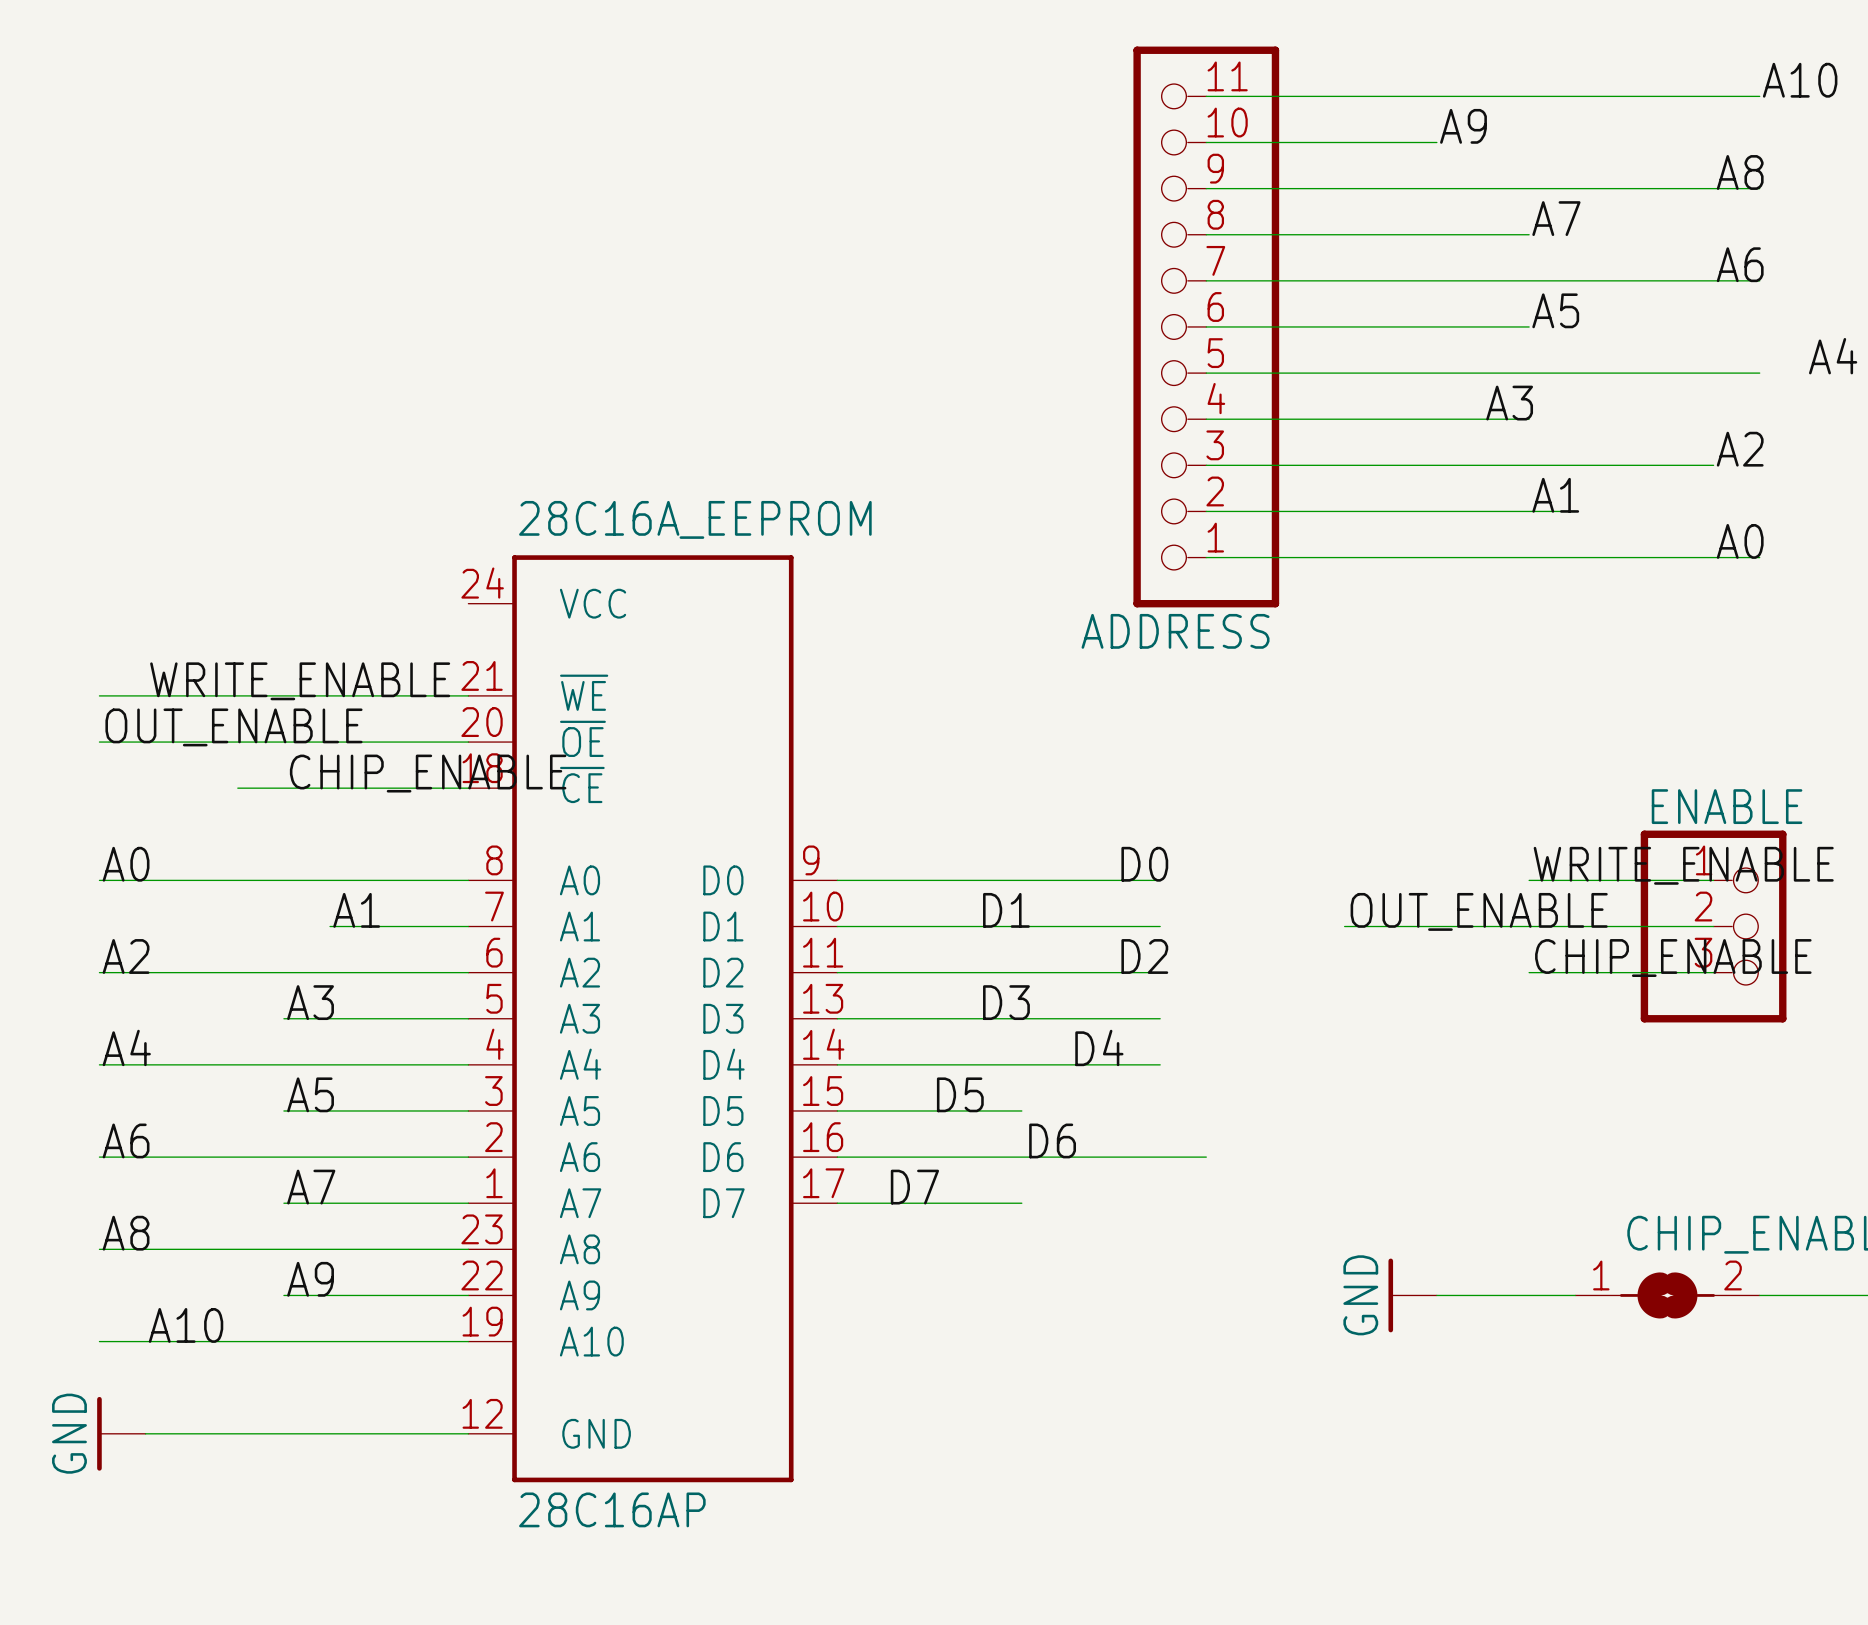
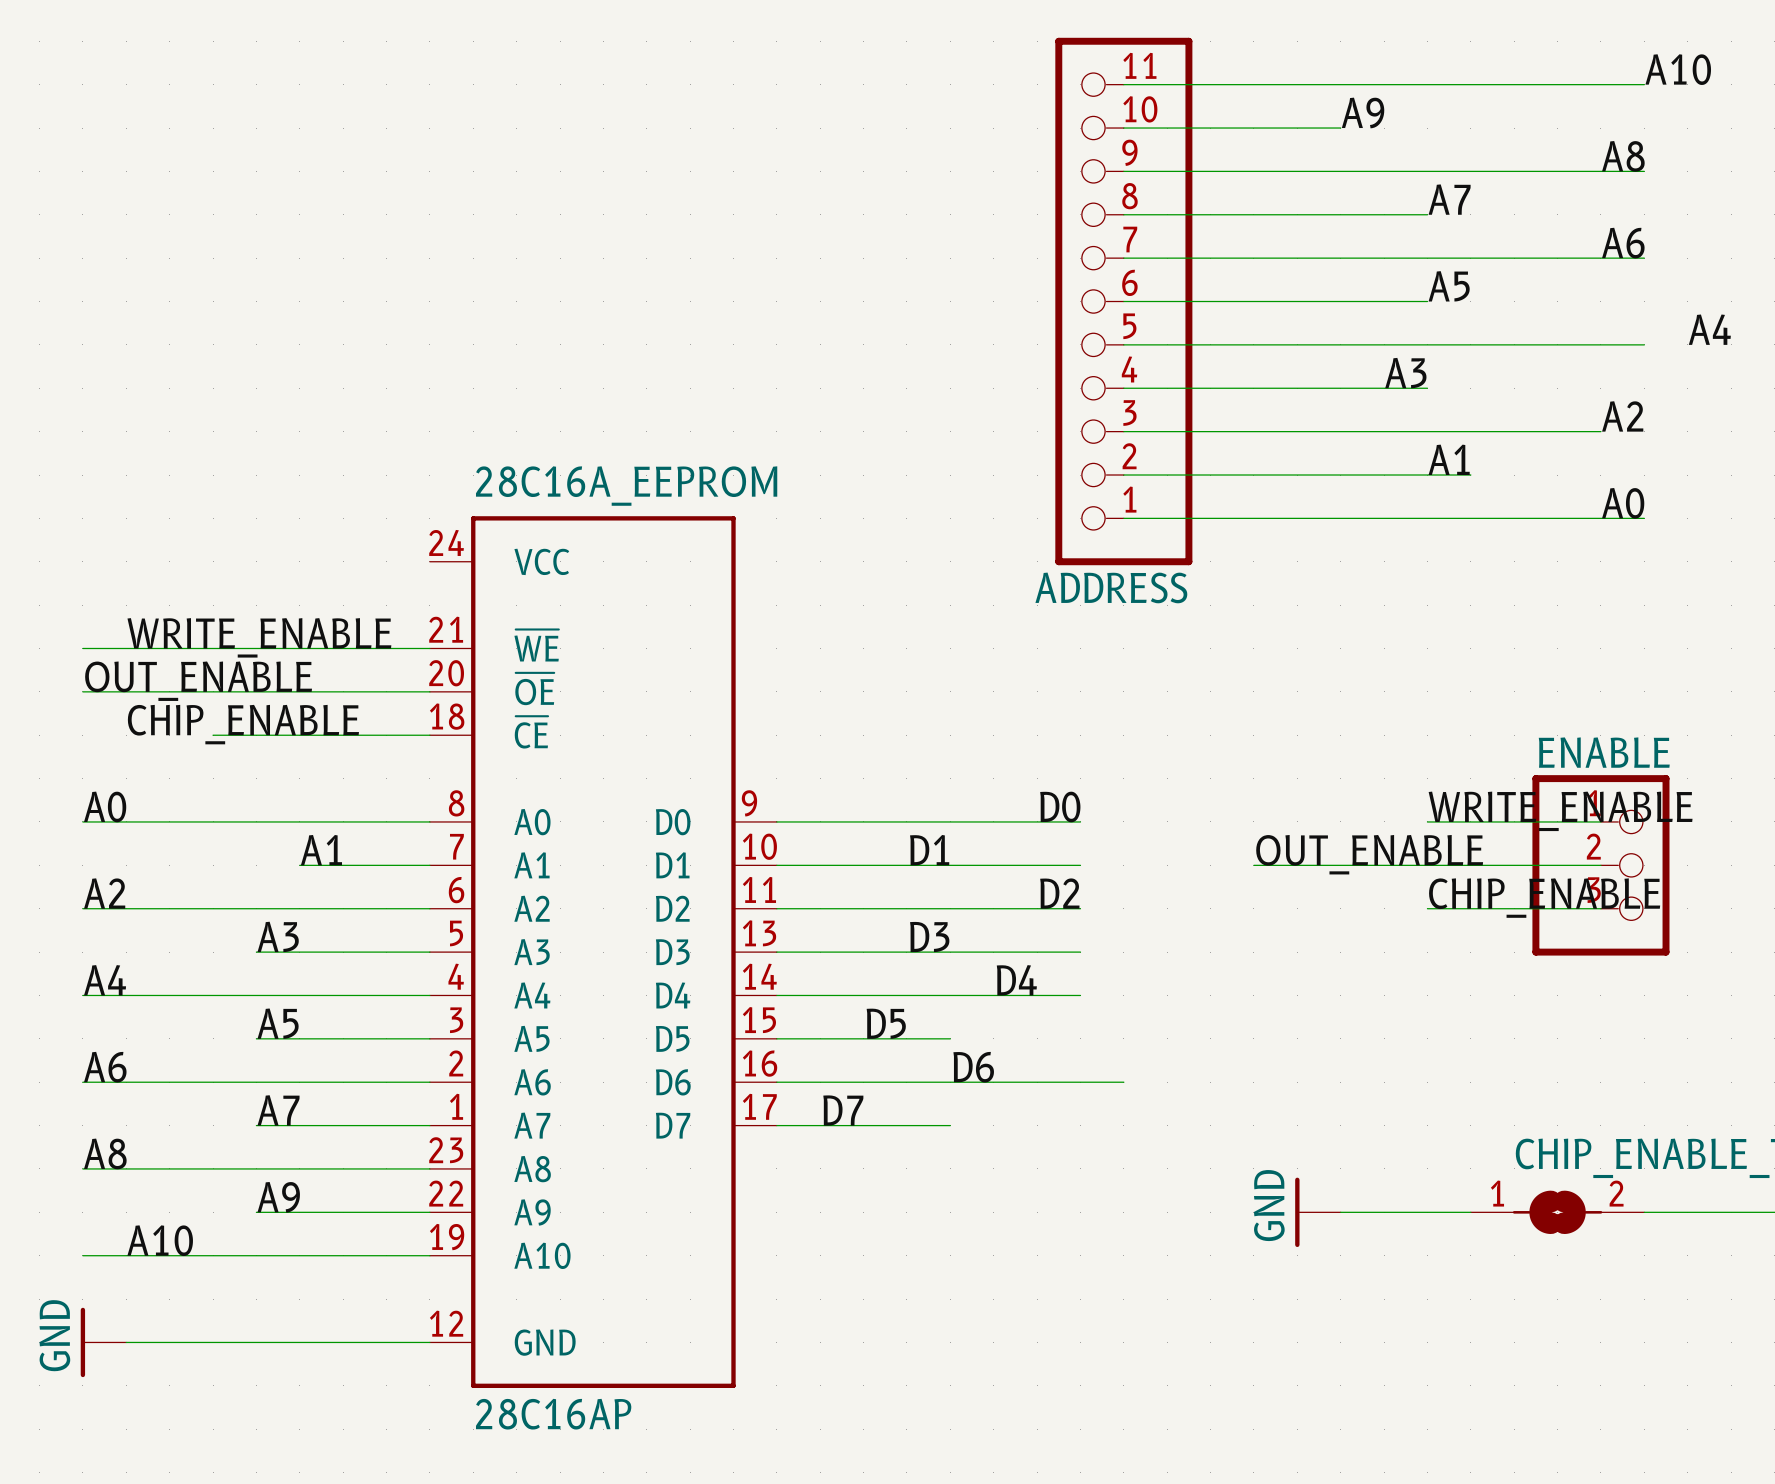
label position: CHIP_ENABLE (428, 773) -> CHIP_ENABLE (243, 724)

